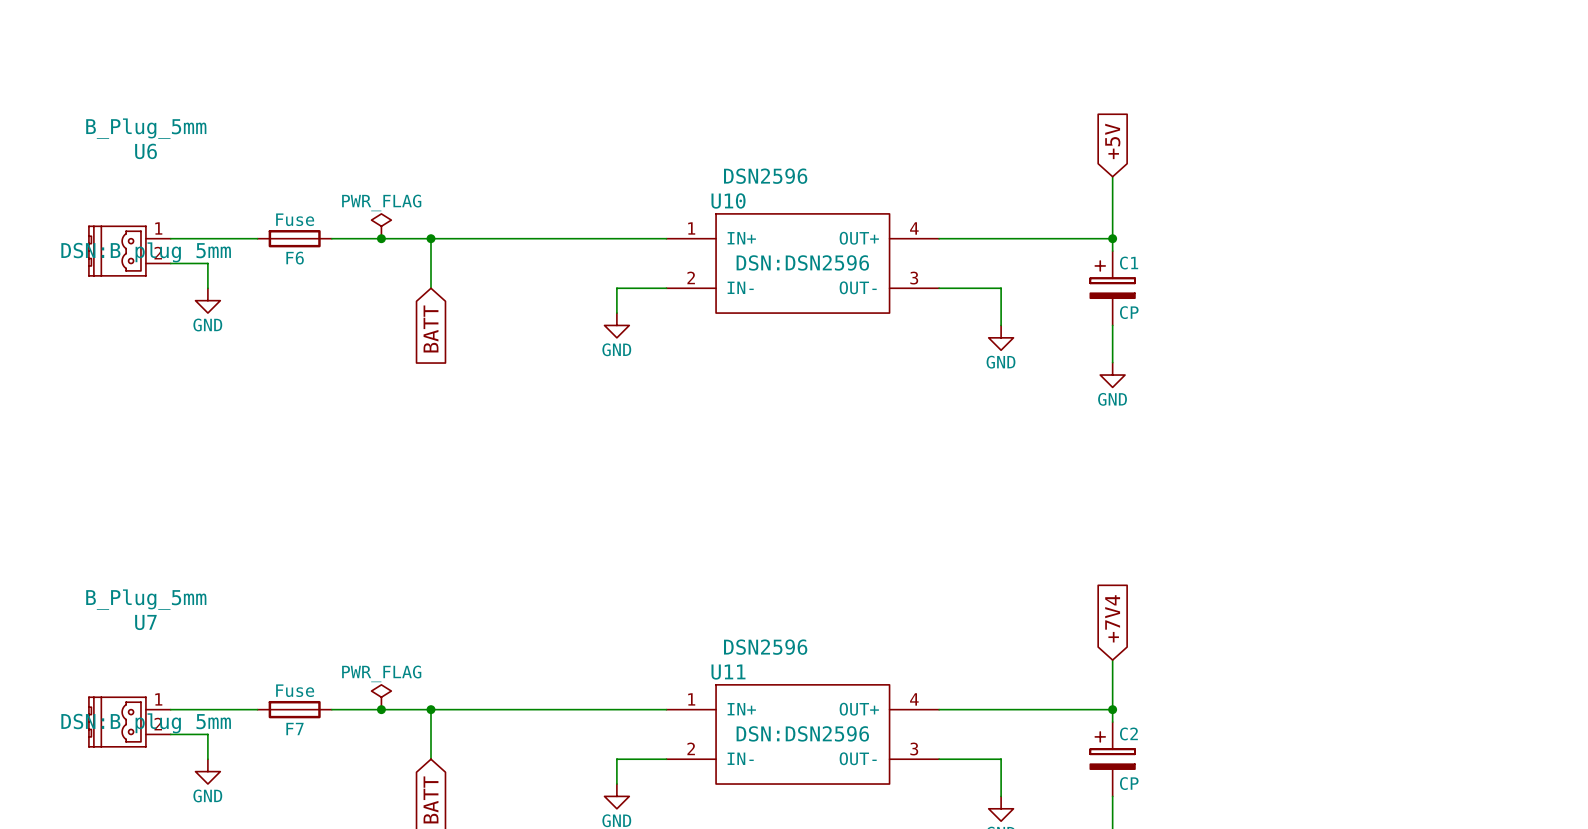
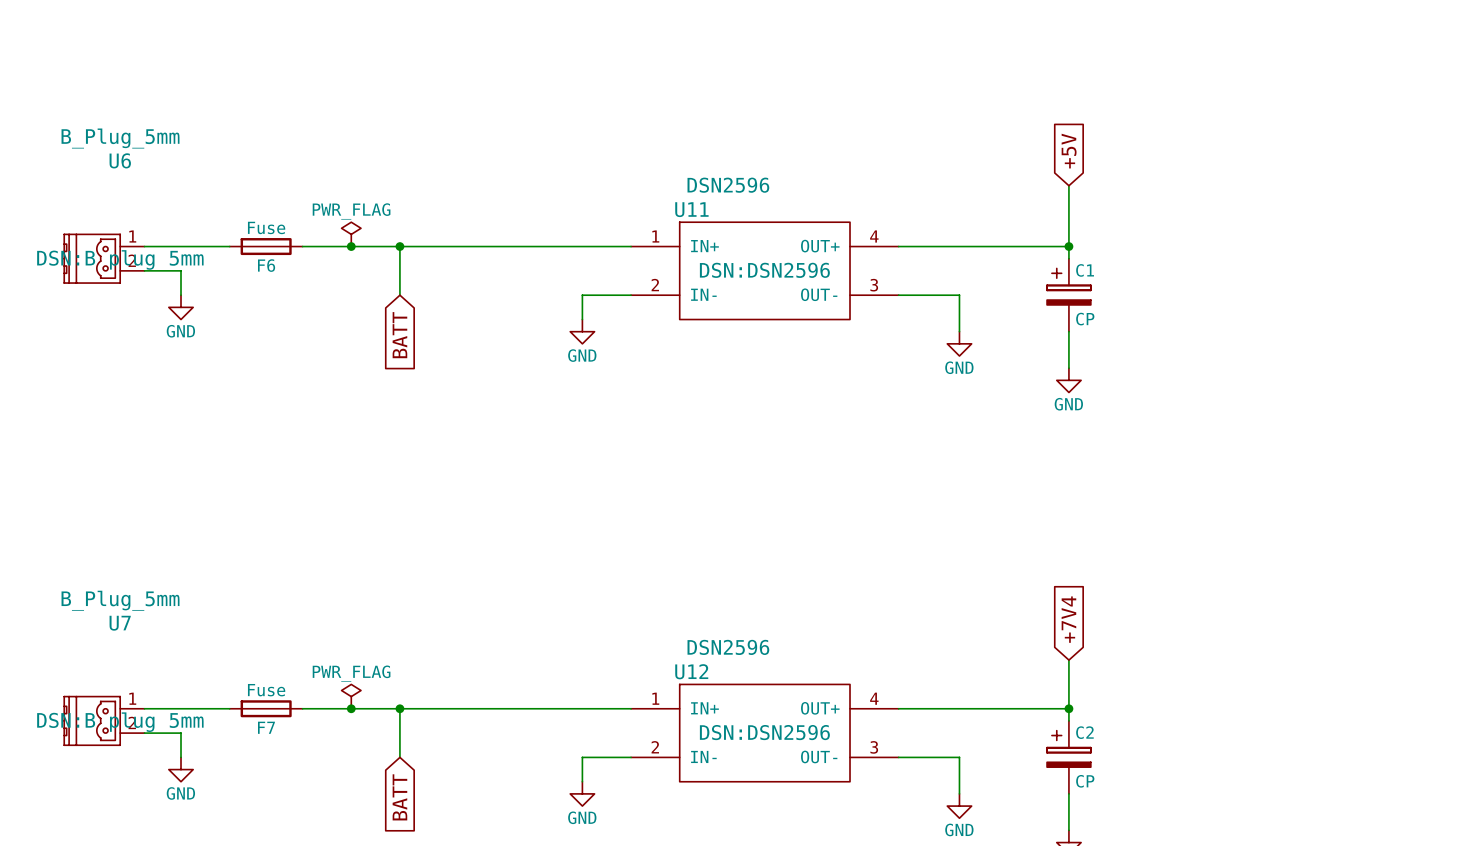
U10 name: U10 (728, 200) -> U11 (691, 209)
U11 name: U11 (728, 672) -> U12 (691, 671)

